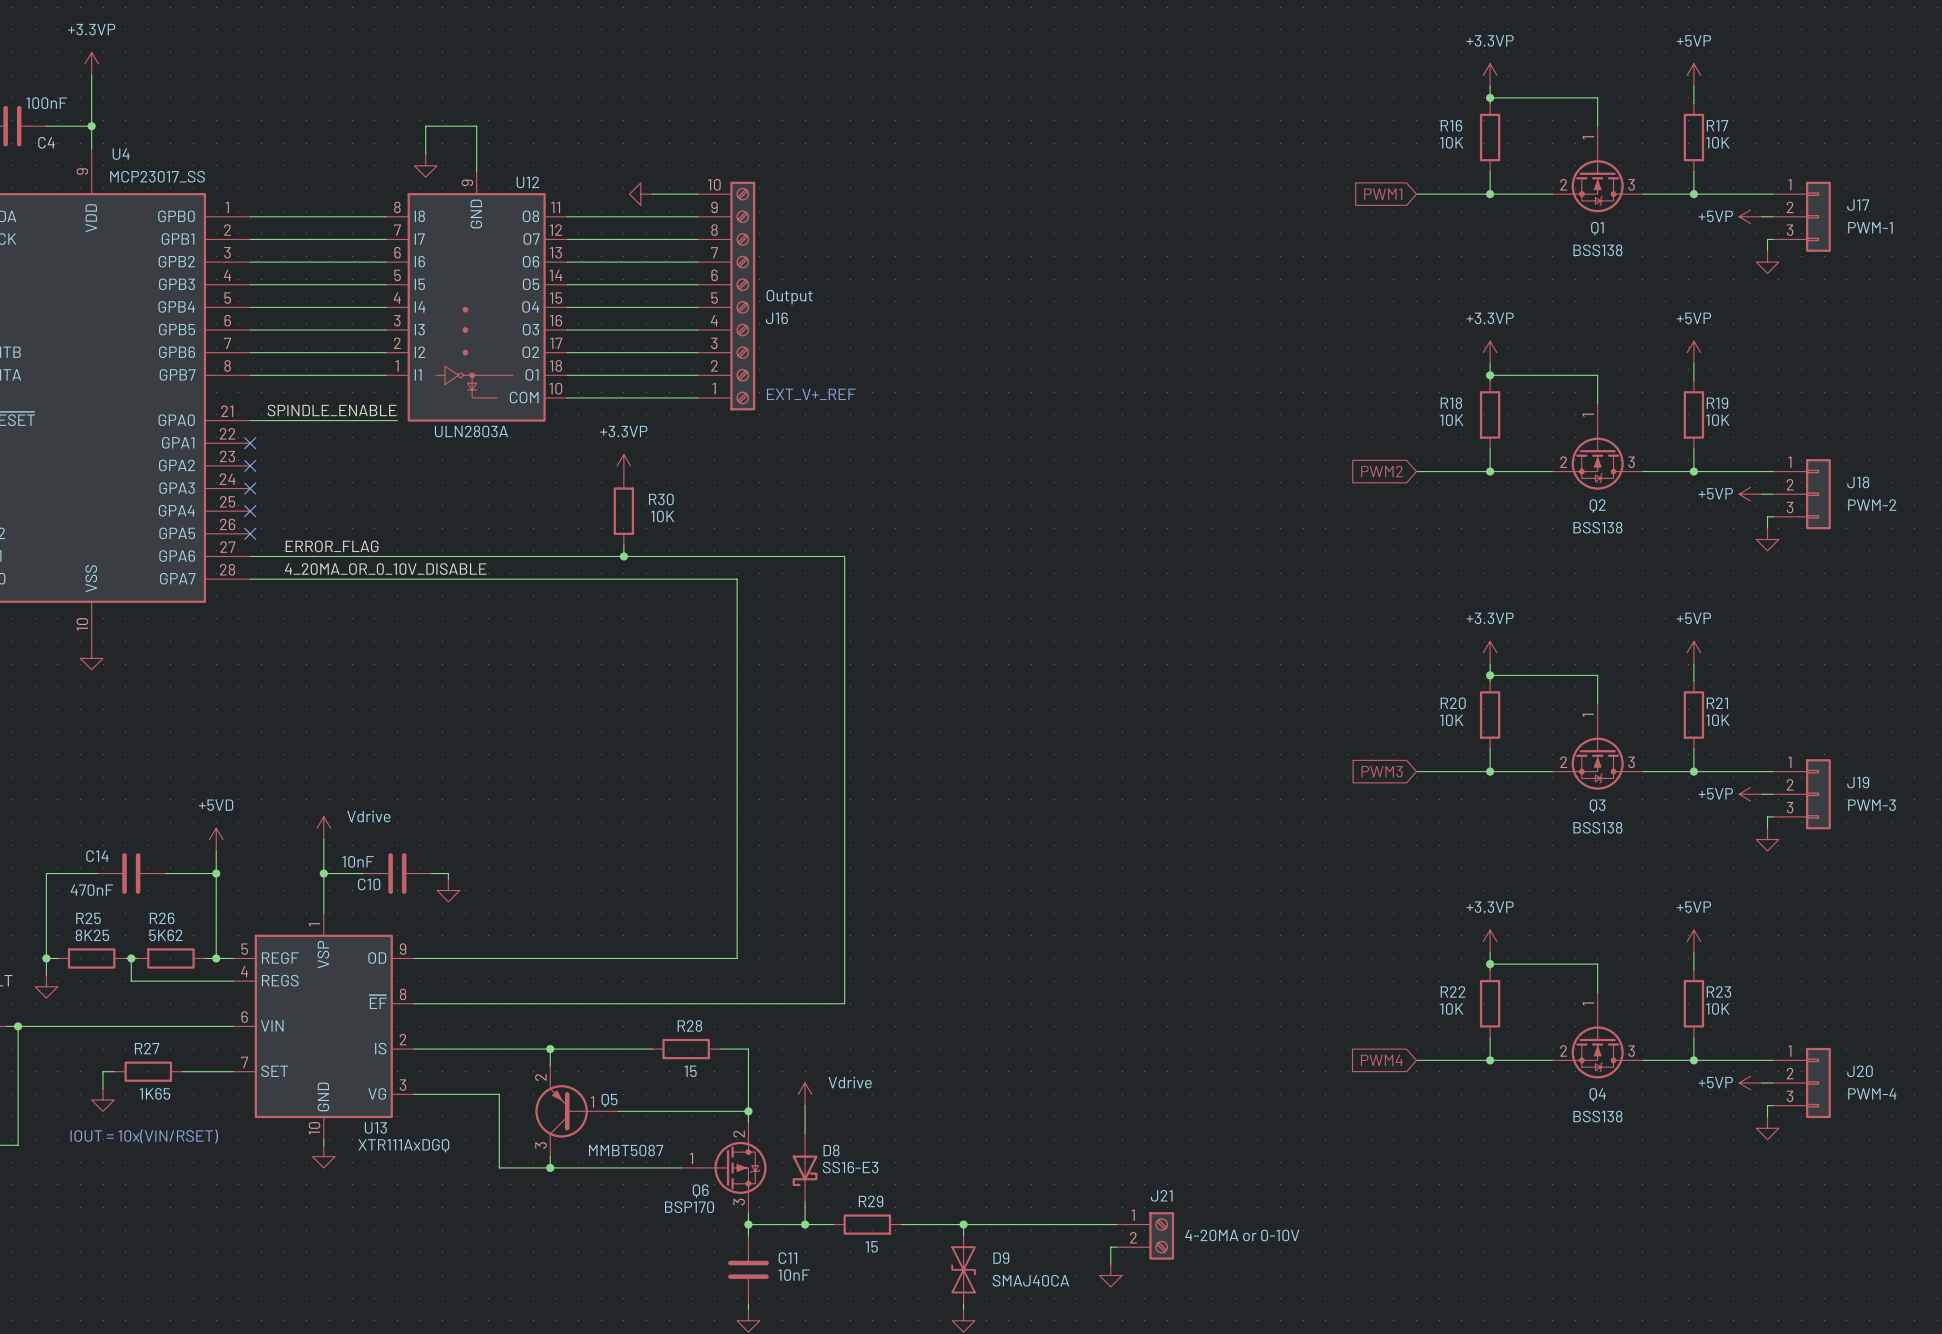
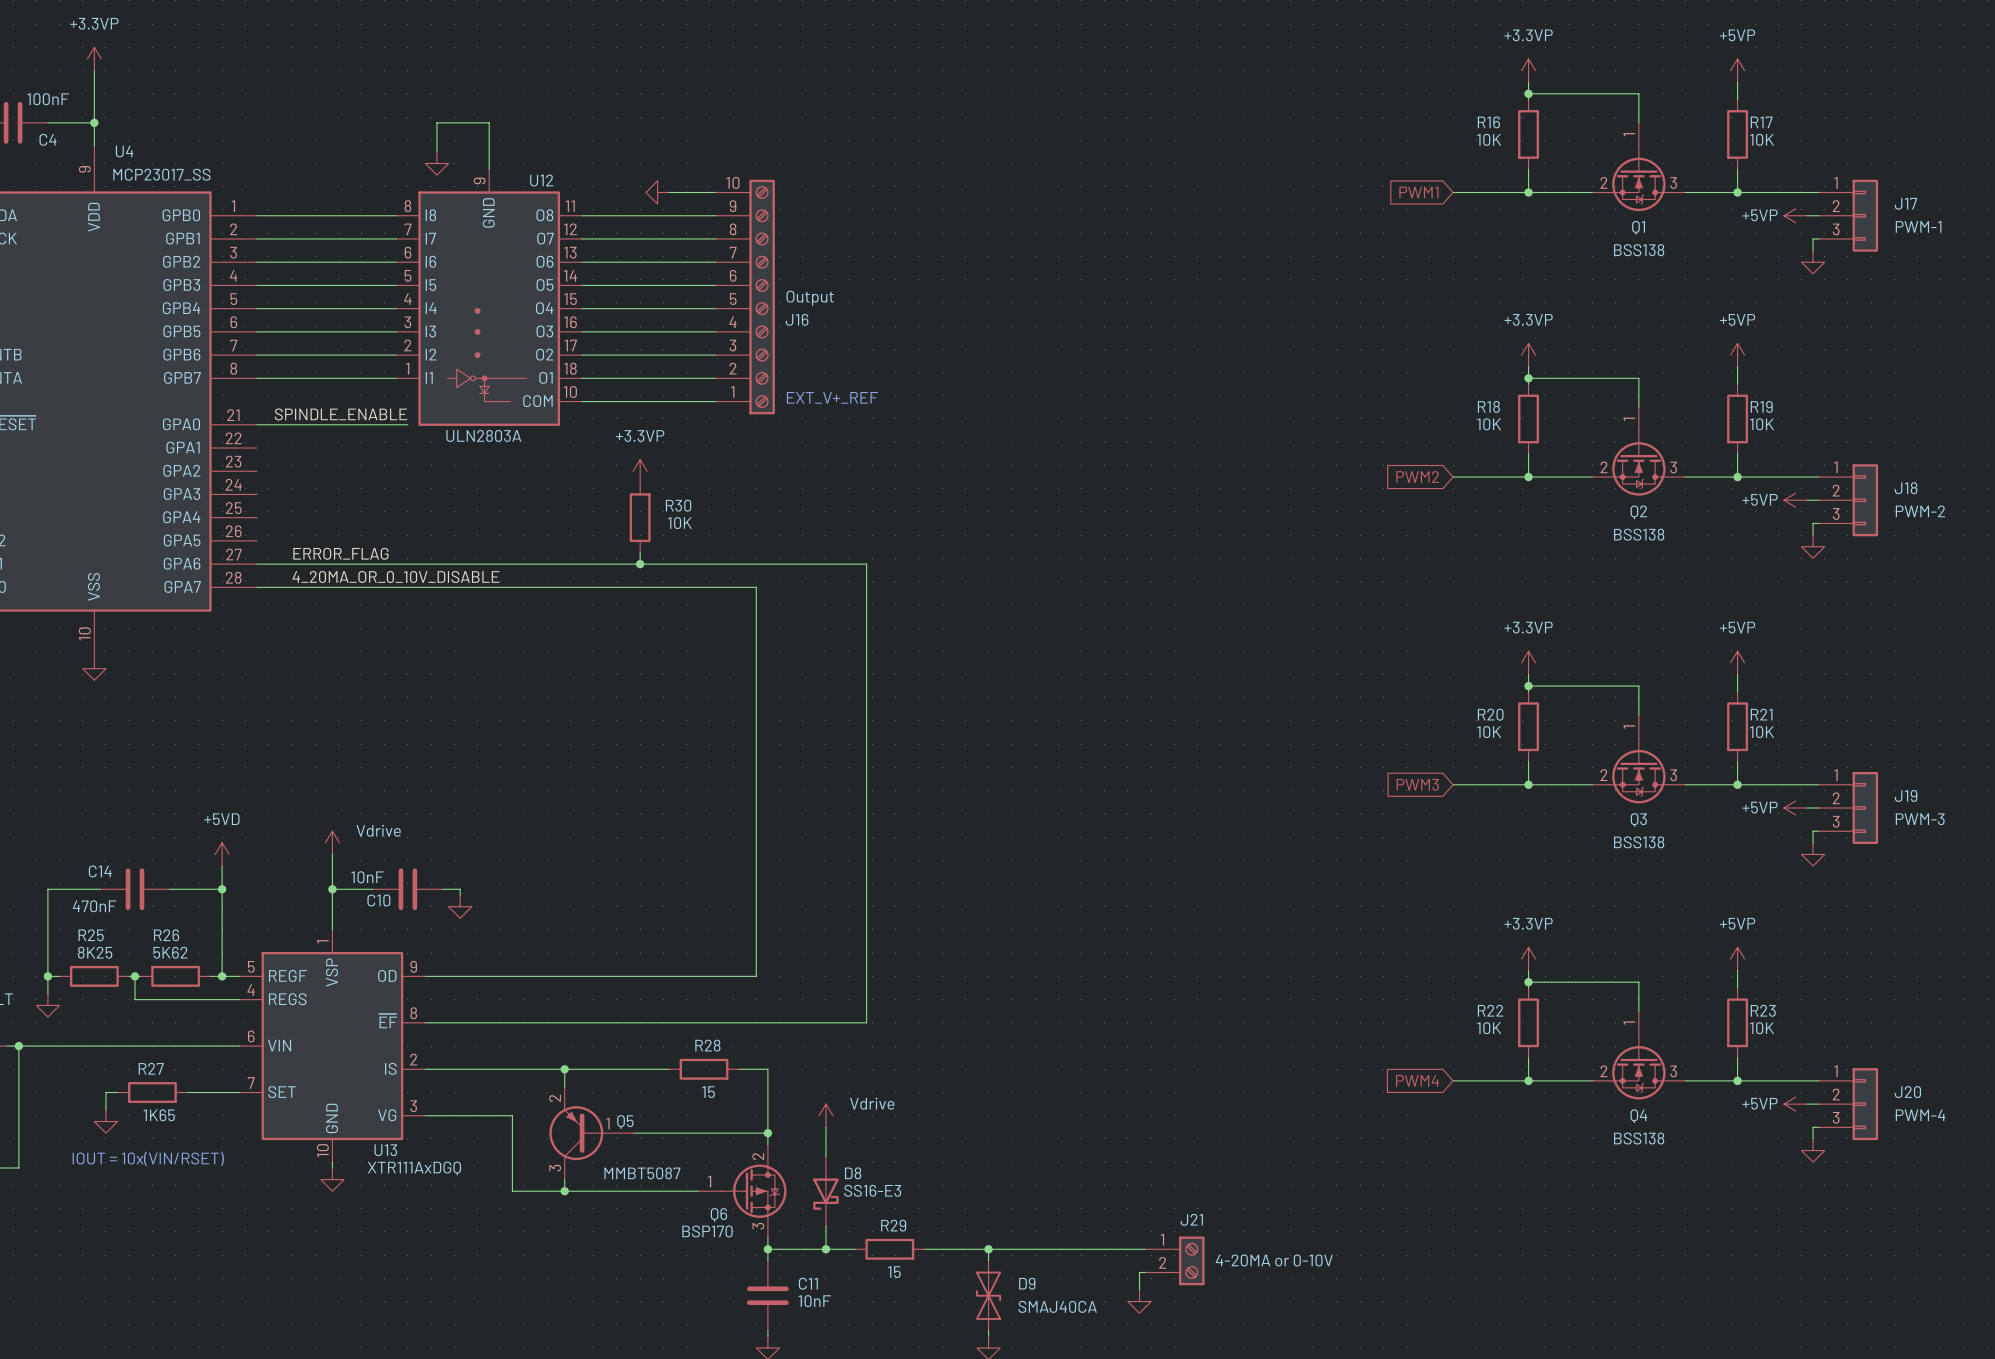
no-connect mark: (250, 443) -> none
no-connect mark: (250, 465) -> none
no-connect mark: (250, 488) -> none
no-connect mark: (250, 511) -> none
no-connect mark: (250, 533) -> none

